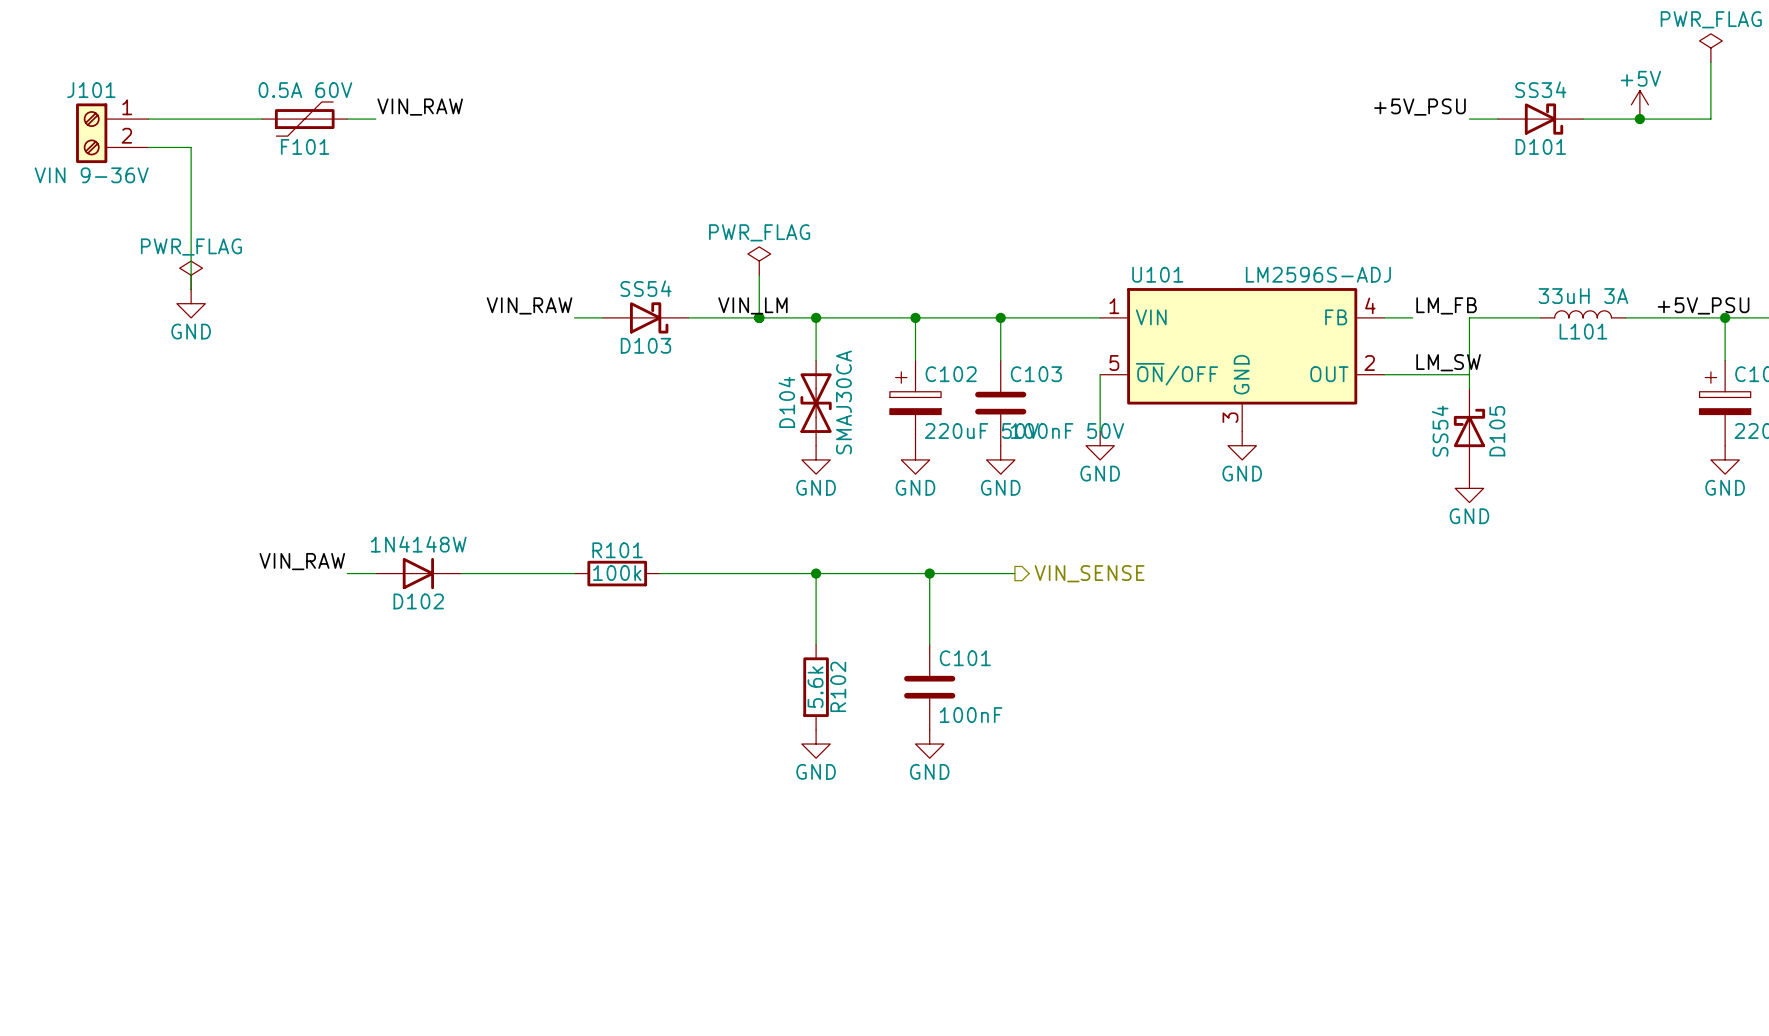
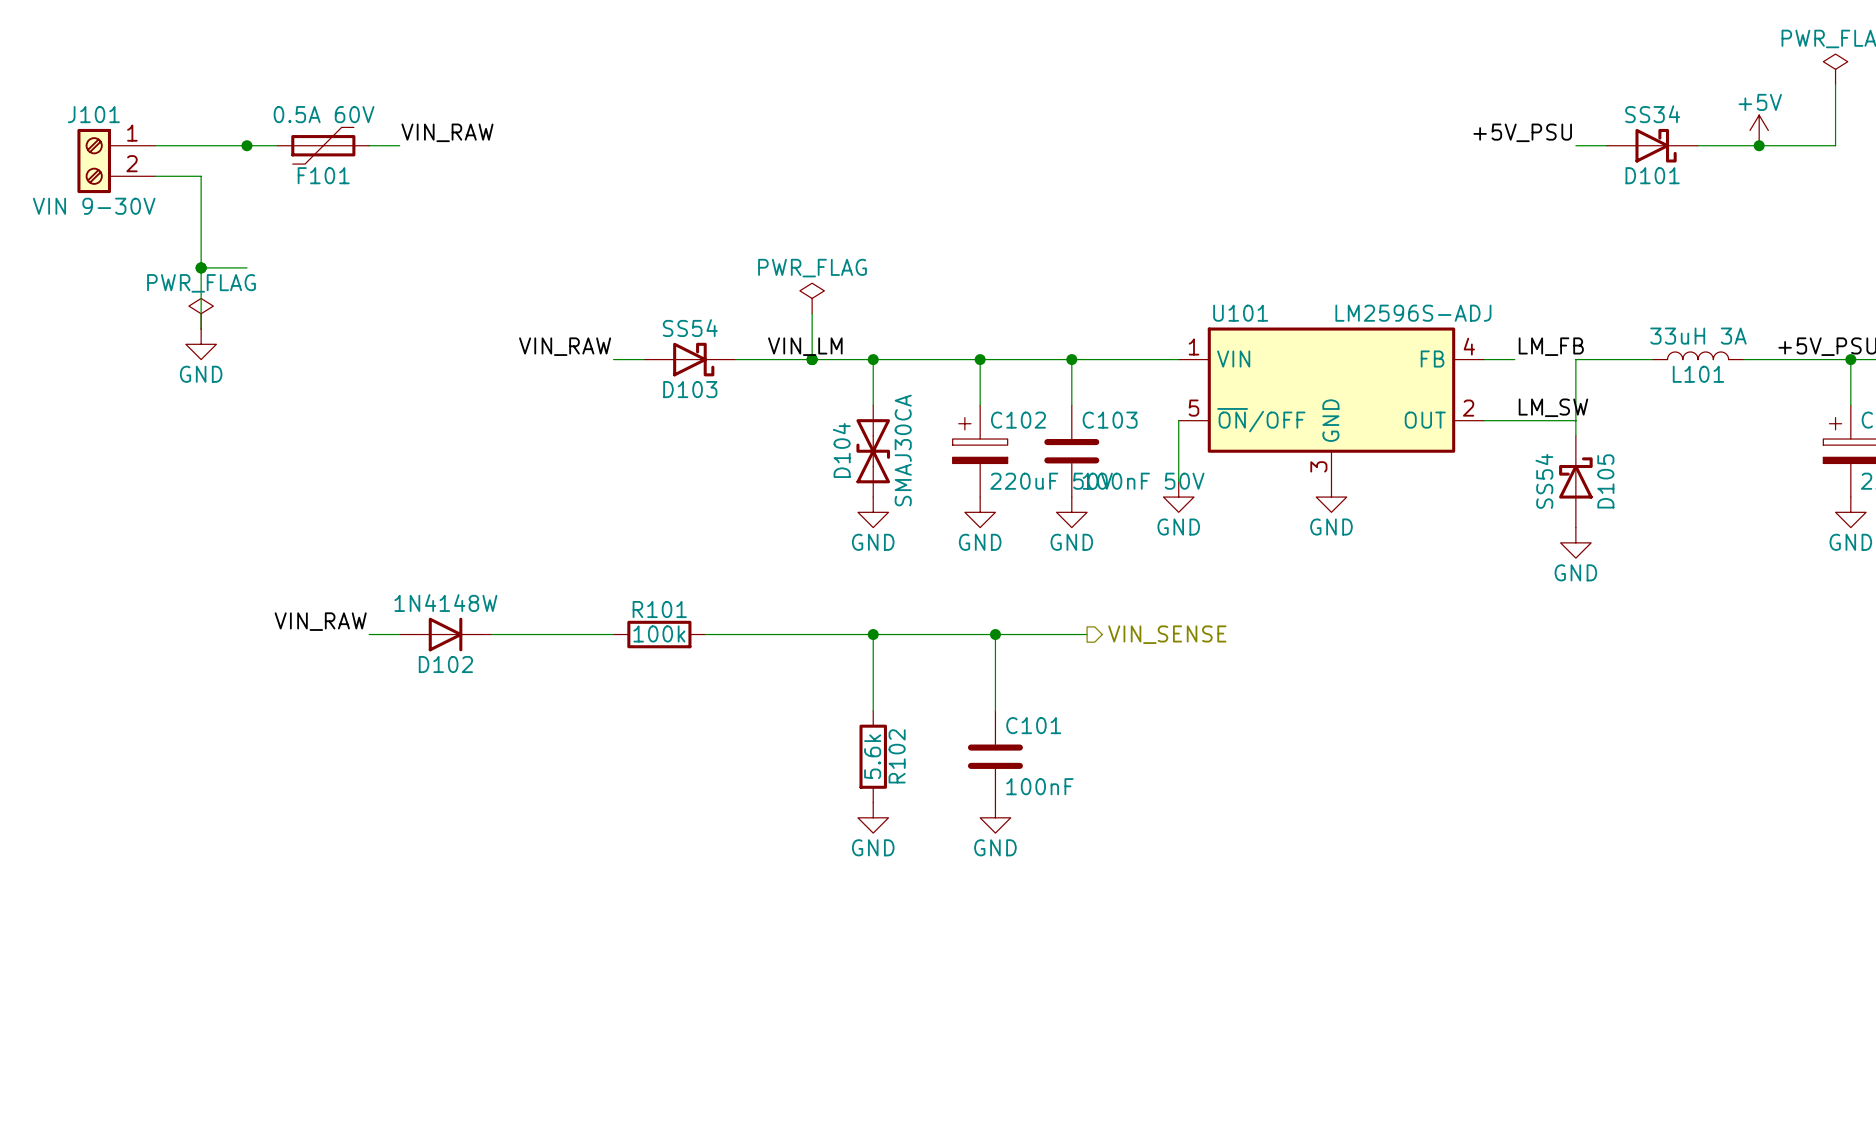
junction: none -> (246, 145)
J101 value: VIN 9-36V (91, 175) -> VIN 9-30V (94, 206)
wire: none -> (201, 267) (246, 267)
junction: none -> (201, 267)

